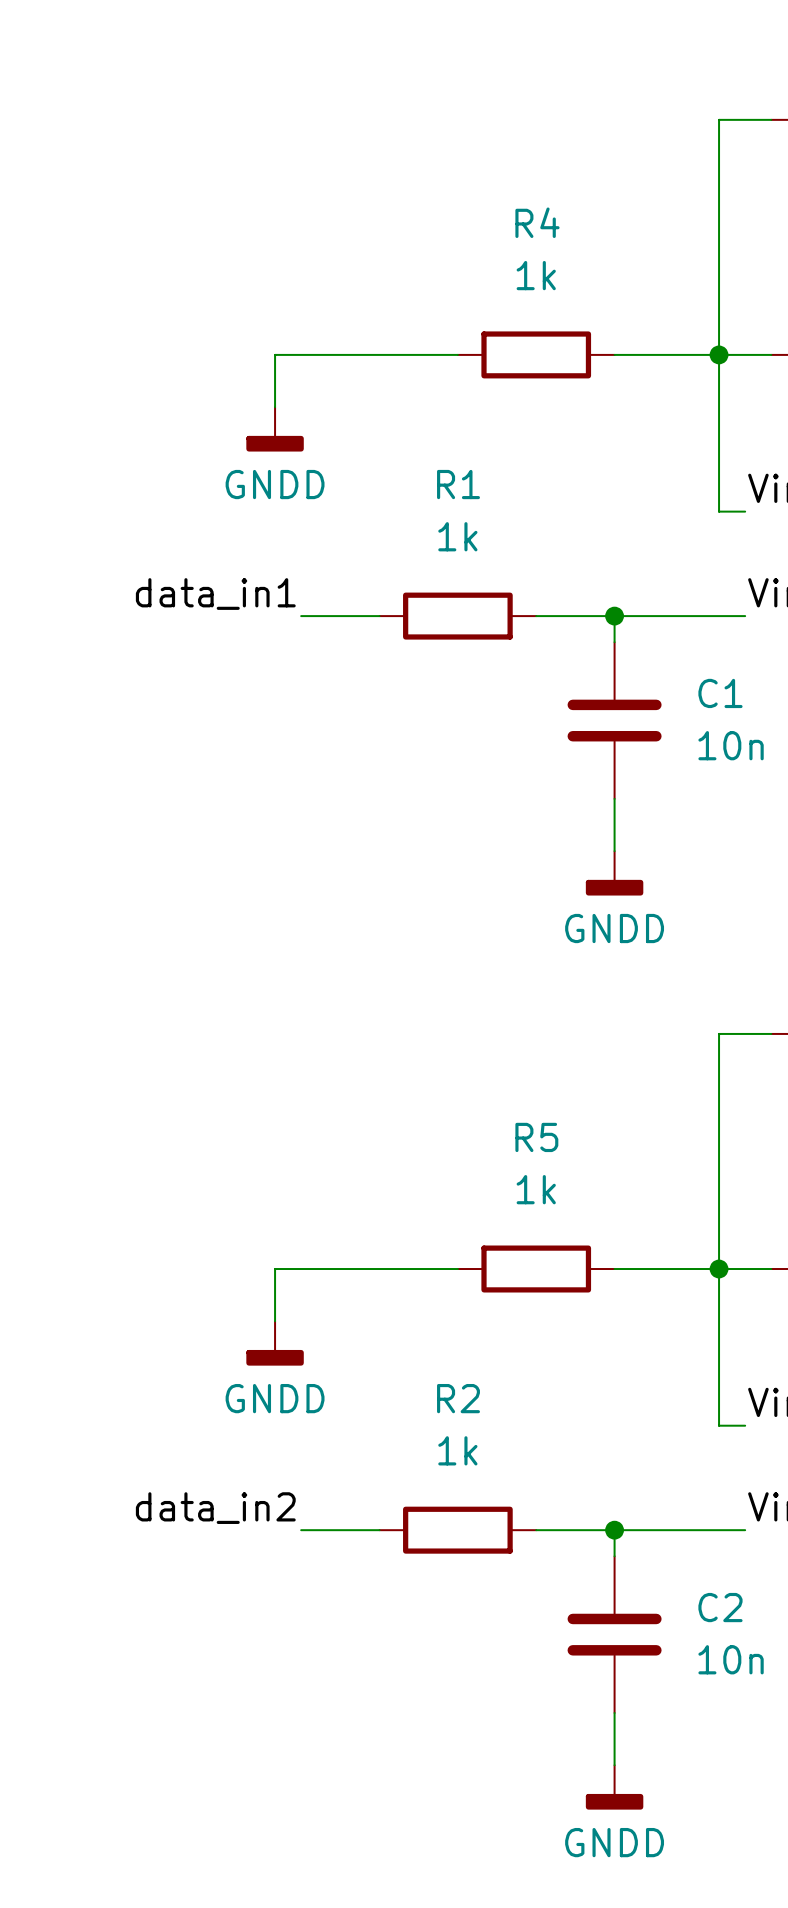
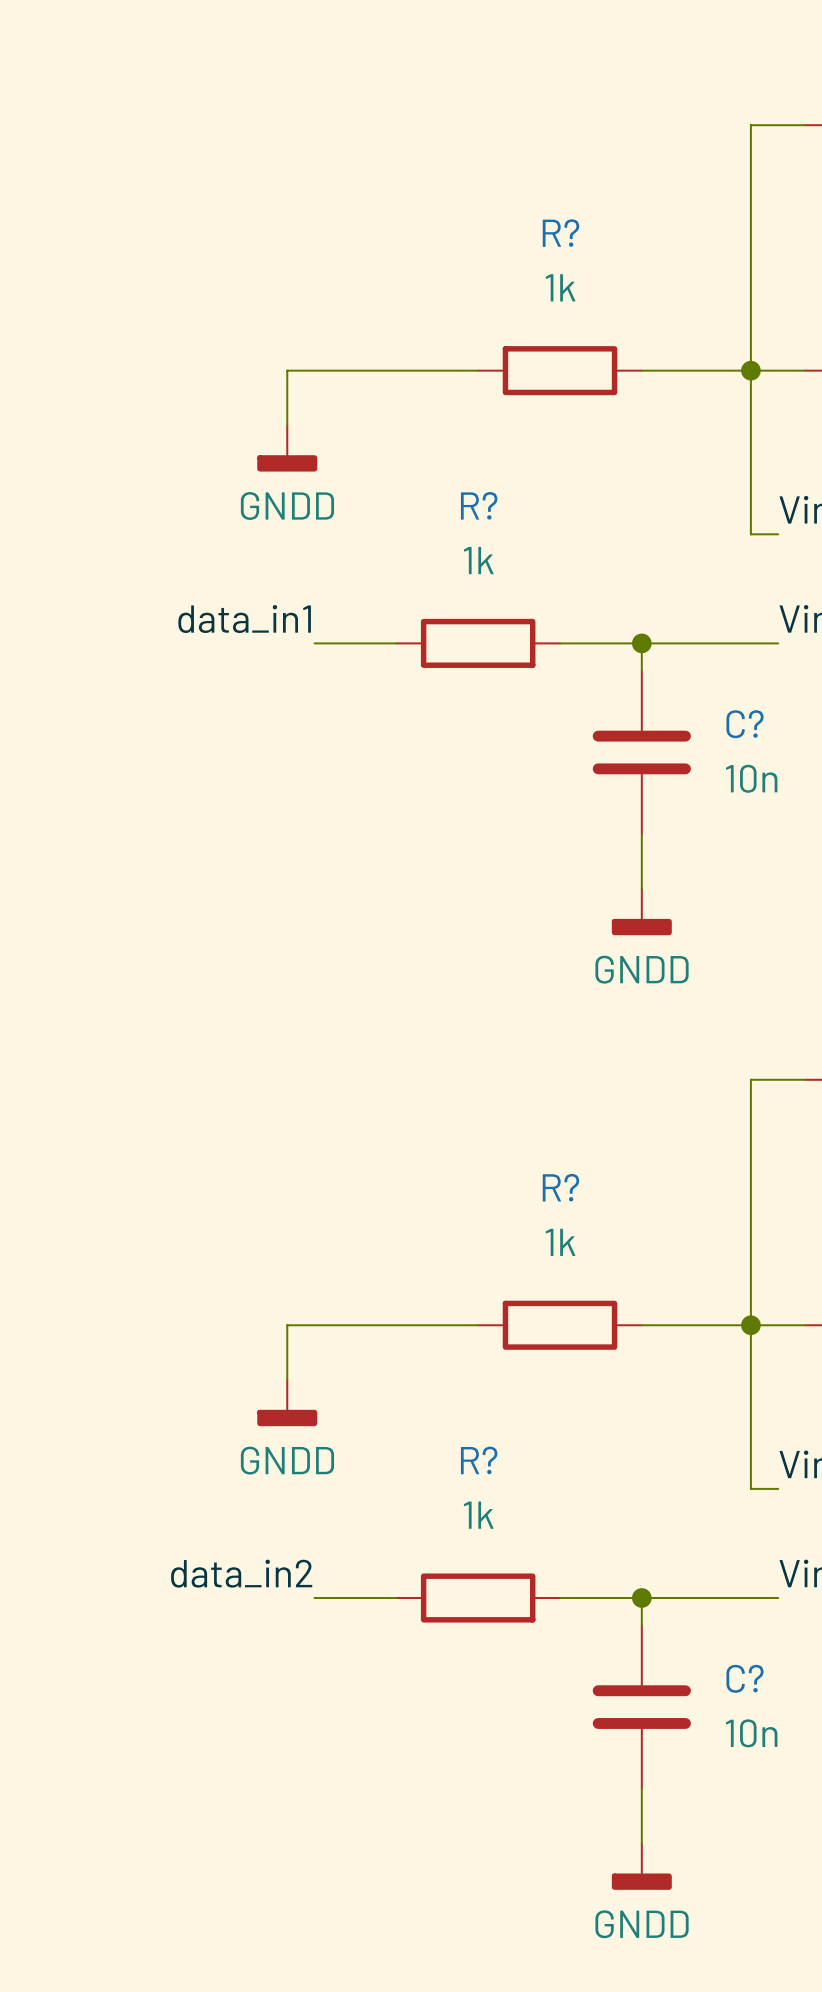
R4 name: R4 (537, 222) -> R? (560, 233)
R1 name: R1 (458, 484) -> R? (479, 505)
C1 name: C1 (720, 693) -> C? (745, 724)
R5 name: R5 (536, 1137) -> R? (560, 1187)
R2 name: R2 (458, 1398) -> R? (479, 1460)
C2 name: C2 (720, 1607) -> C? (745, 1678)

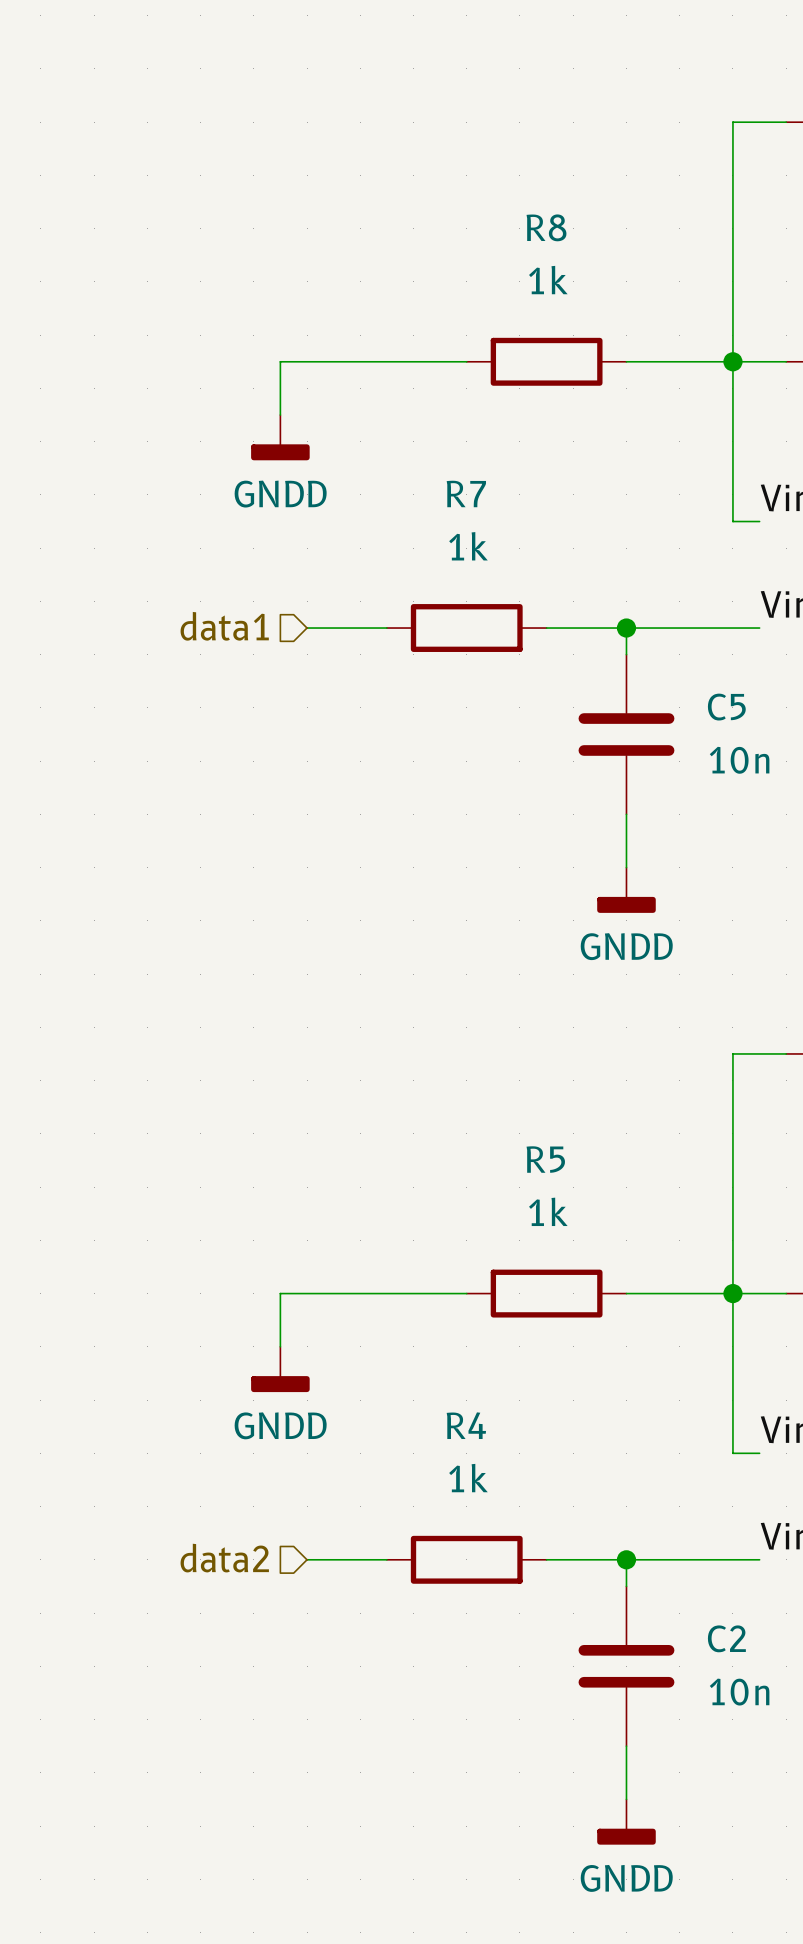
R? name: R? (560, 233) -> R8 (546, 227)
R? name: R? (479, 505) -> R7 (466, 493)
label: data_in1 (244, 619) -> none
hierarchical label: none -> data1 (224, 626)
C? name: C? (745, 724) -> C5 (726, 707)
R? name: R? (560, 1187) -> R5 (545, 1159)
R? name: R? (479, 1460) -> R4 (466, 1425)
label: data_in2 (241, 1573) -> none
hierarchical label: none -> data2 (224, 1558)
C? name: C? (745, 1678) -> C2 (726, 1638)

